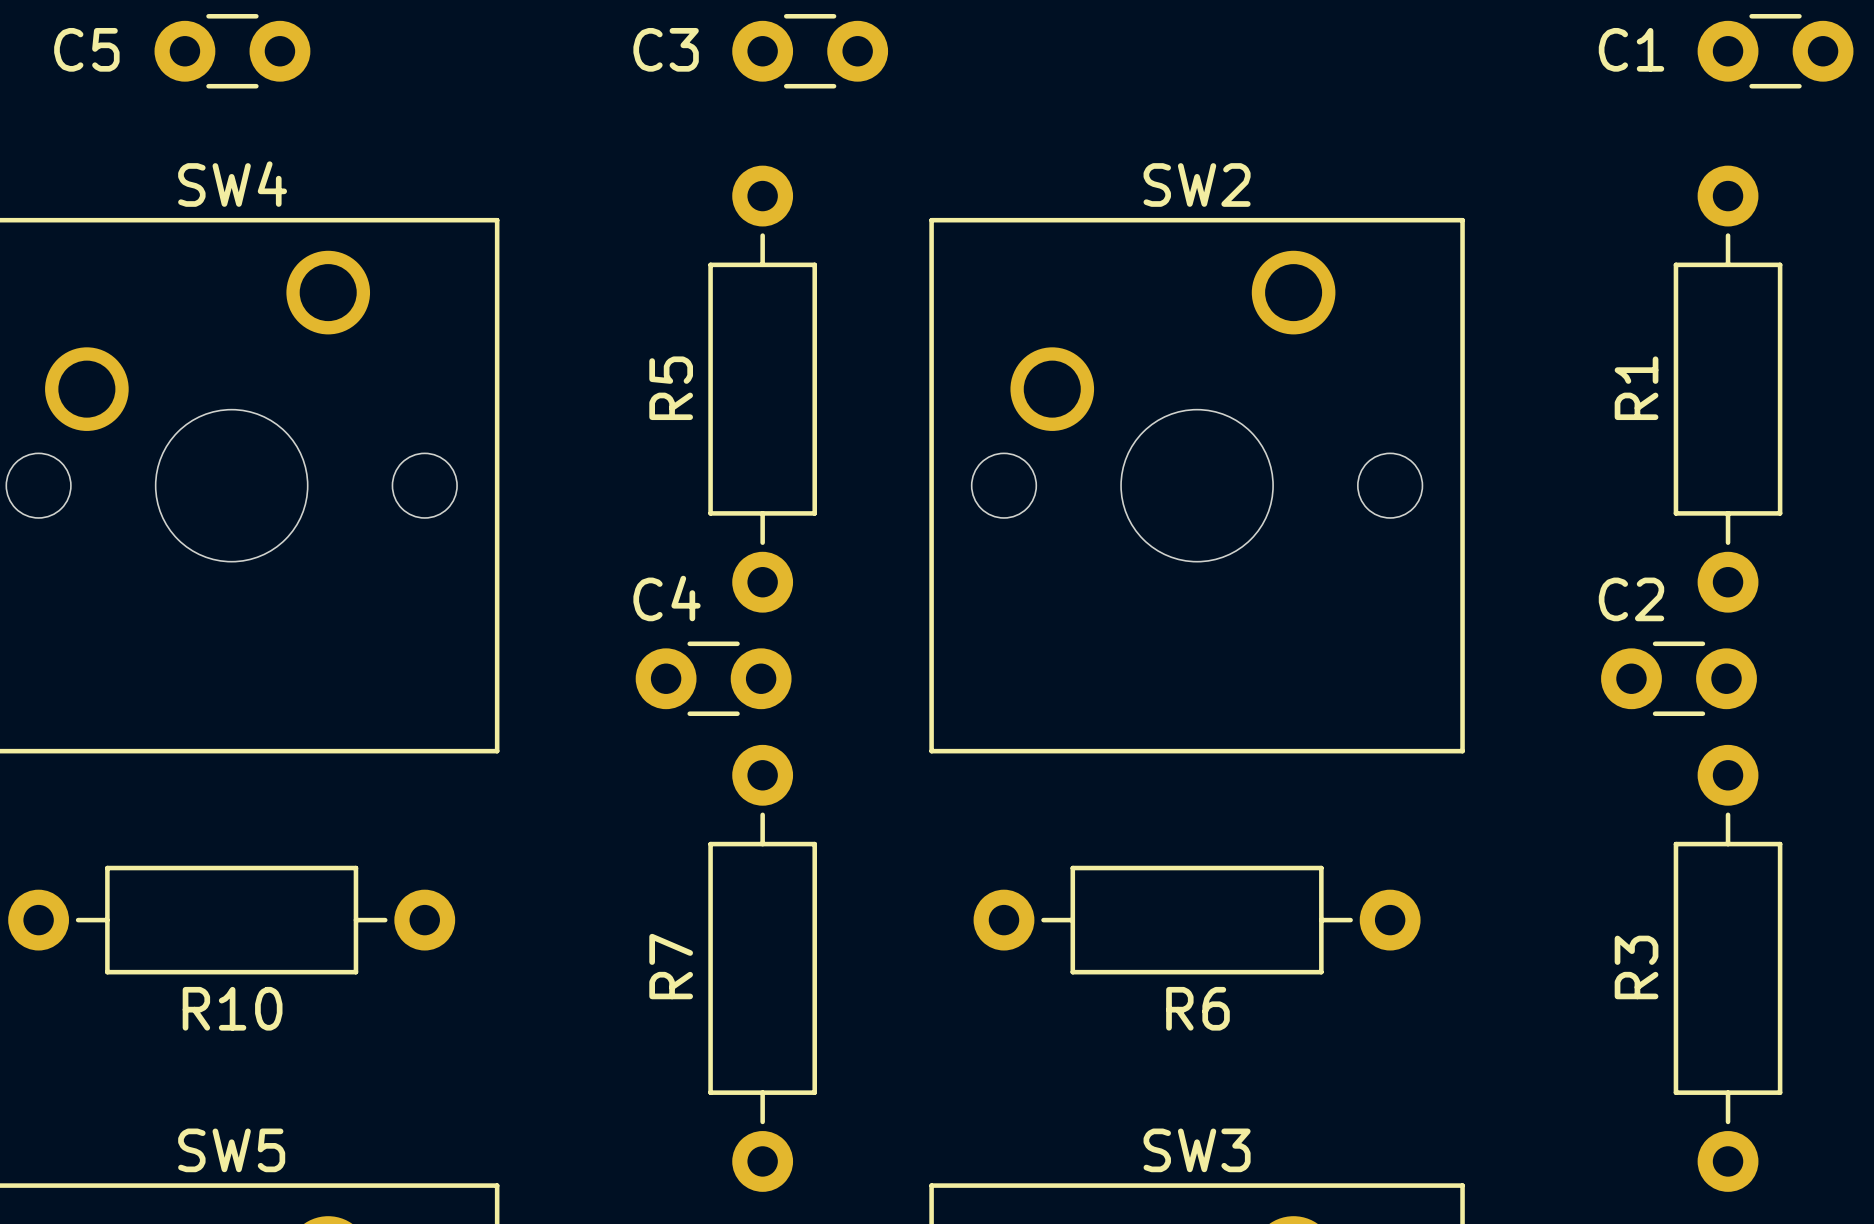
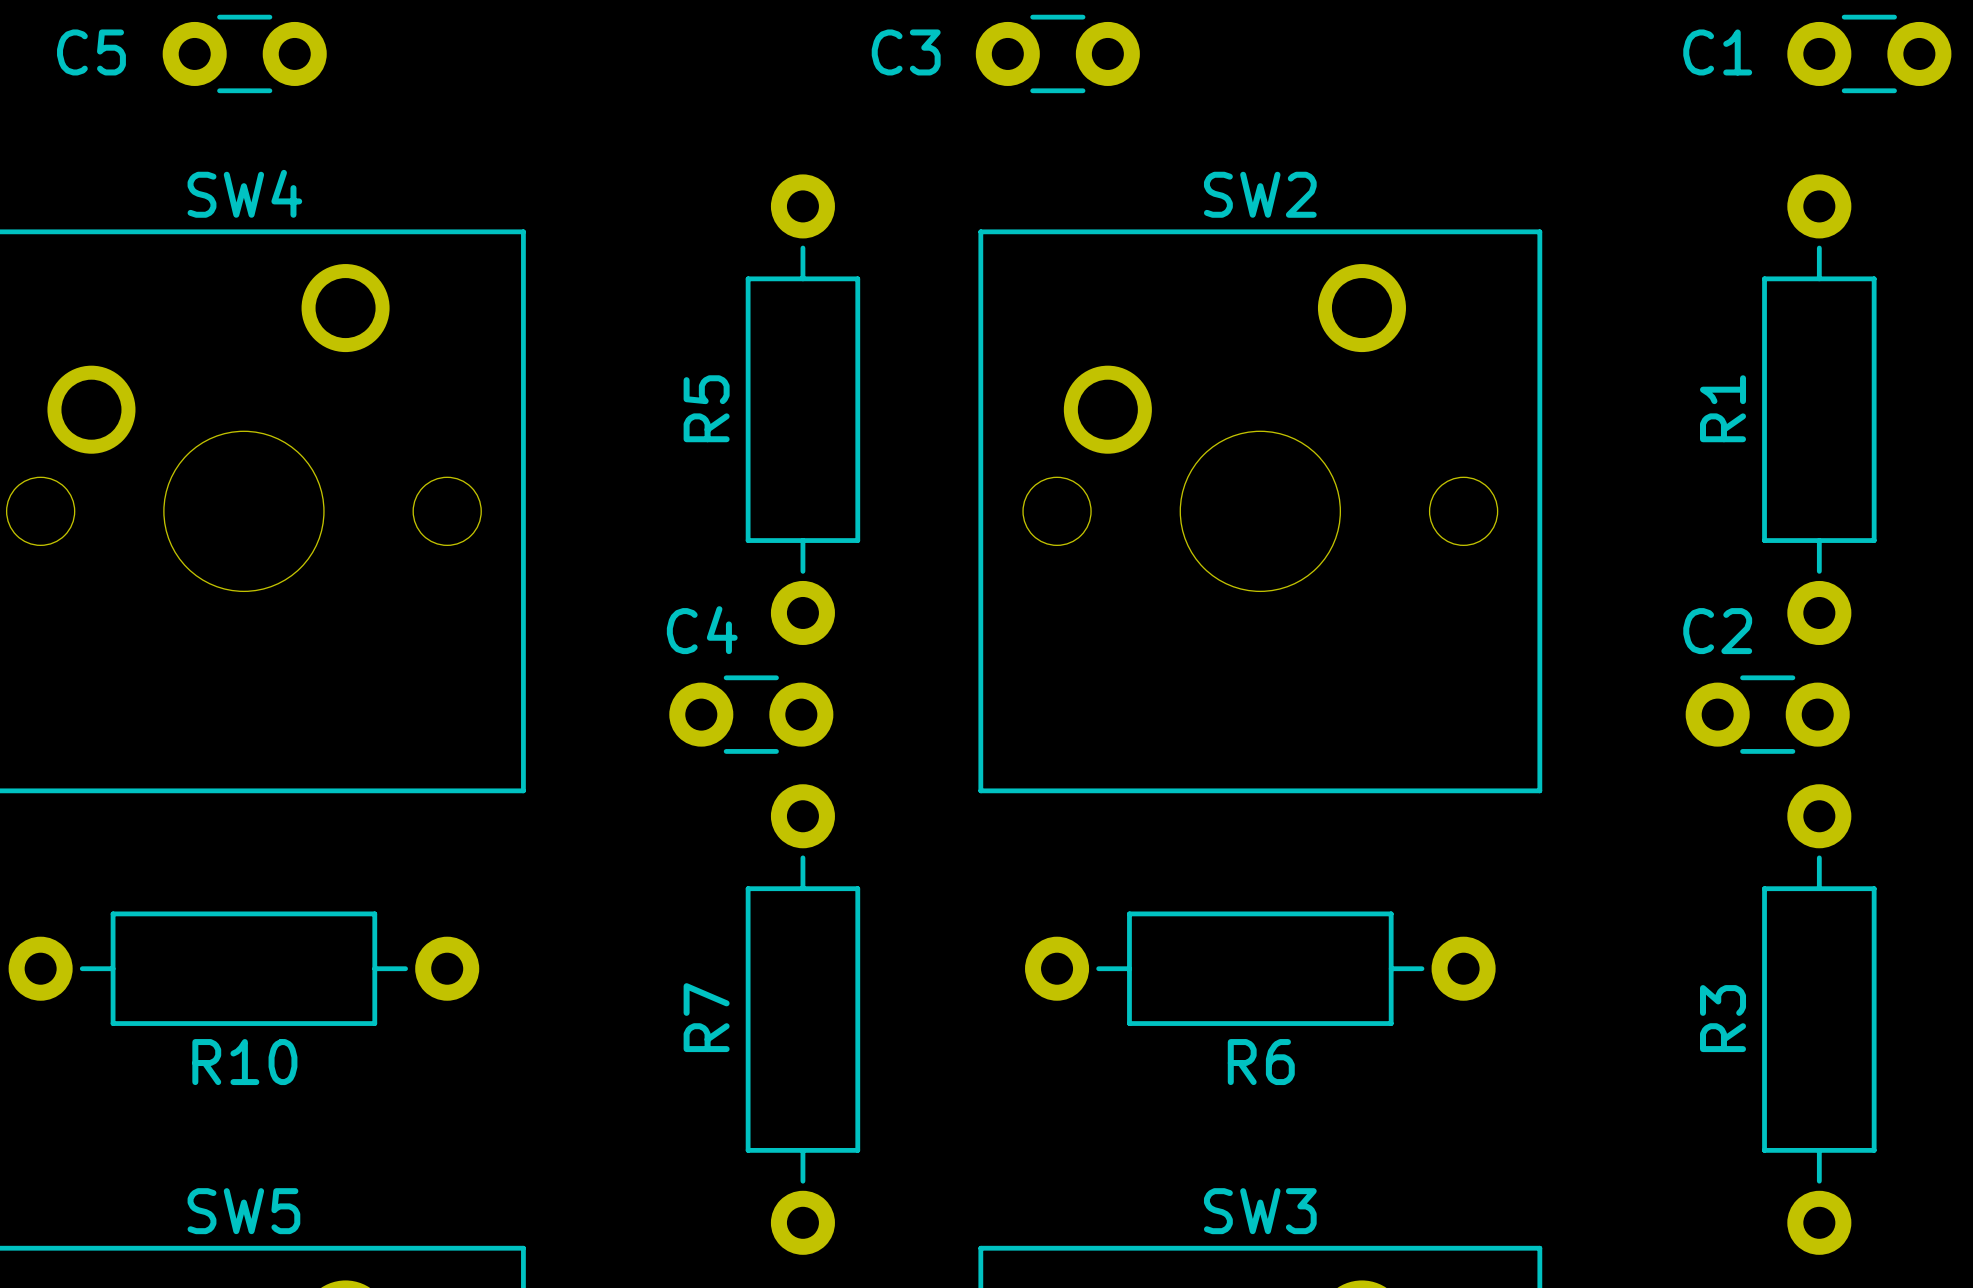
C3 position: (810, 51) -> (1057, 53)

